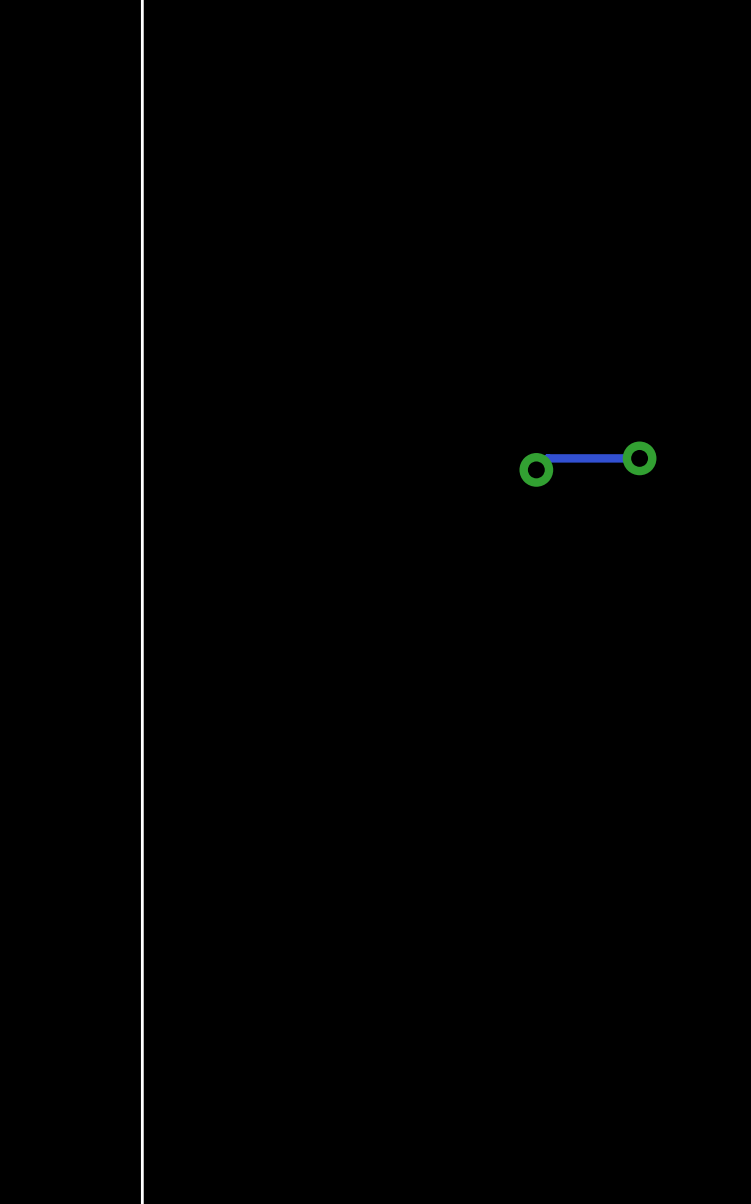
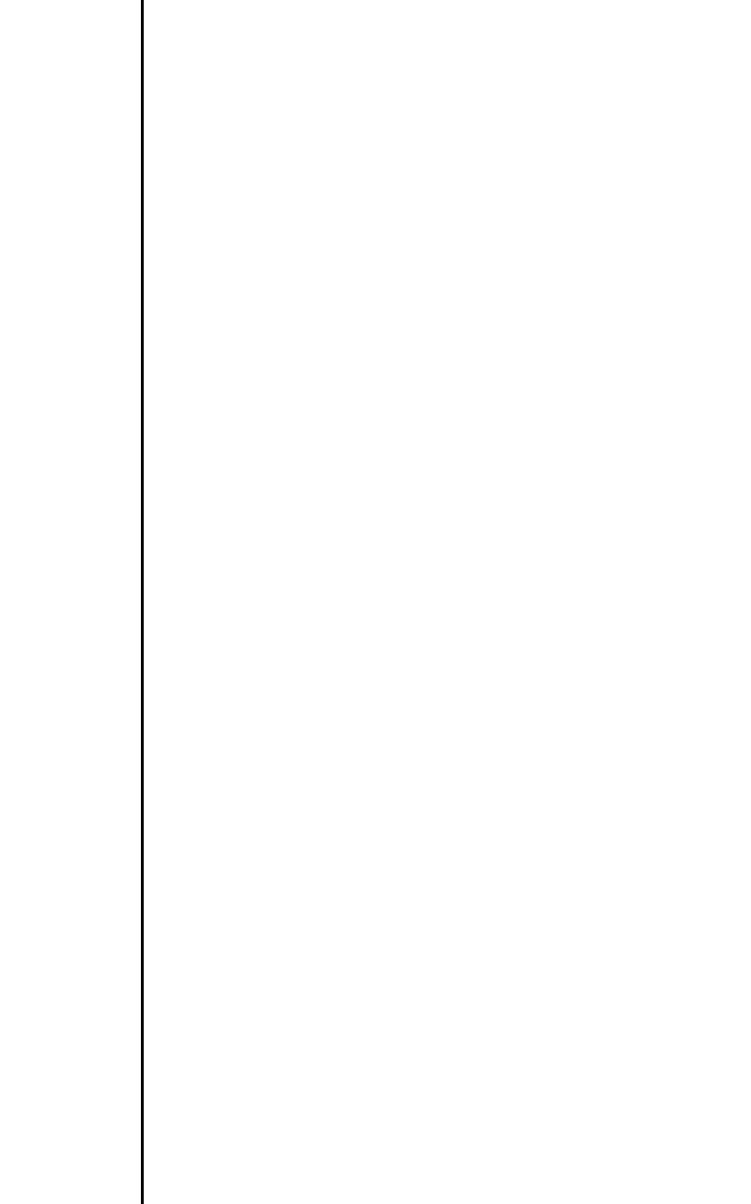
track: (639, 458) (547, 458) (536, 469) -> none
via: (639, 458) -> none
via: (536, 469) -> none

